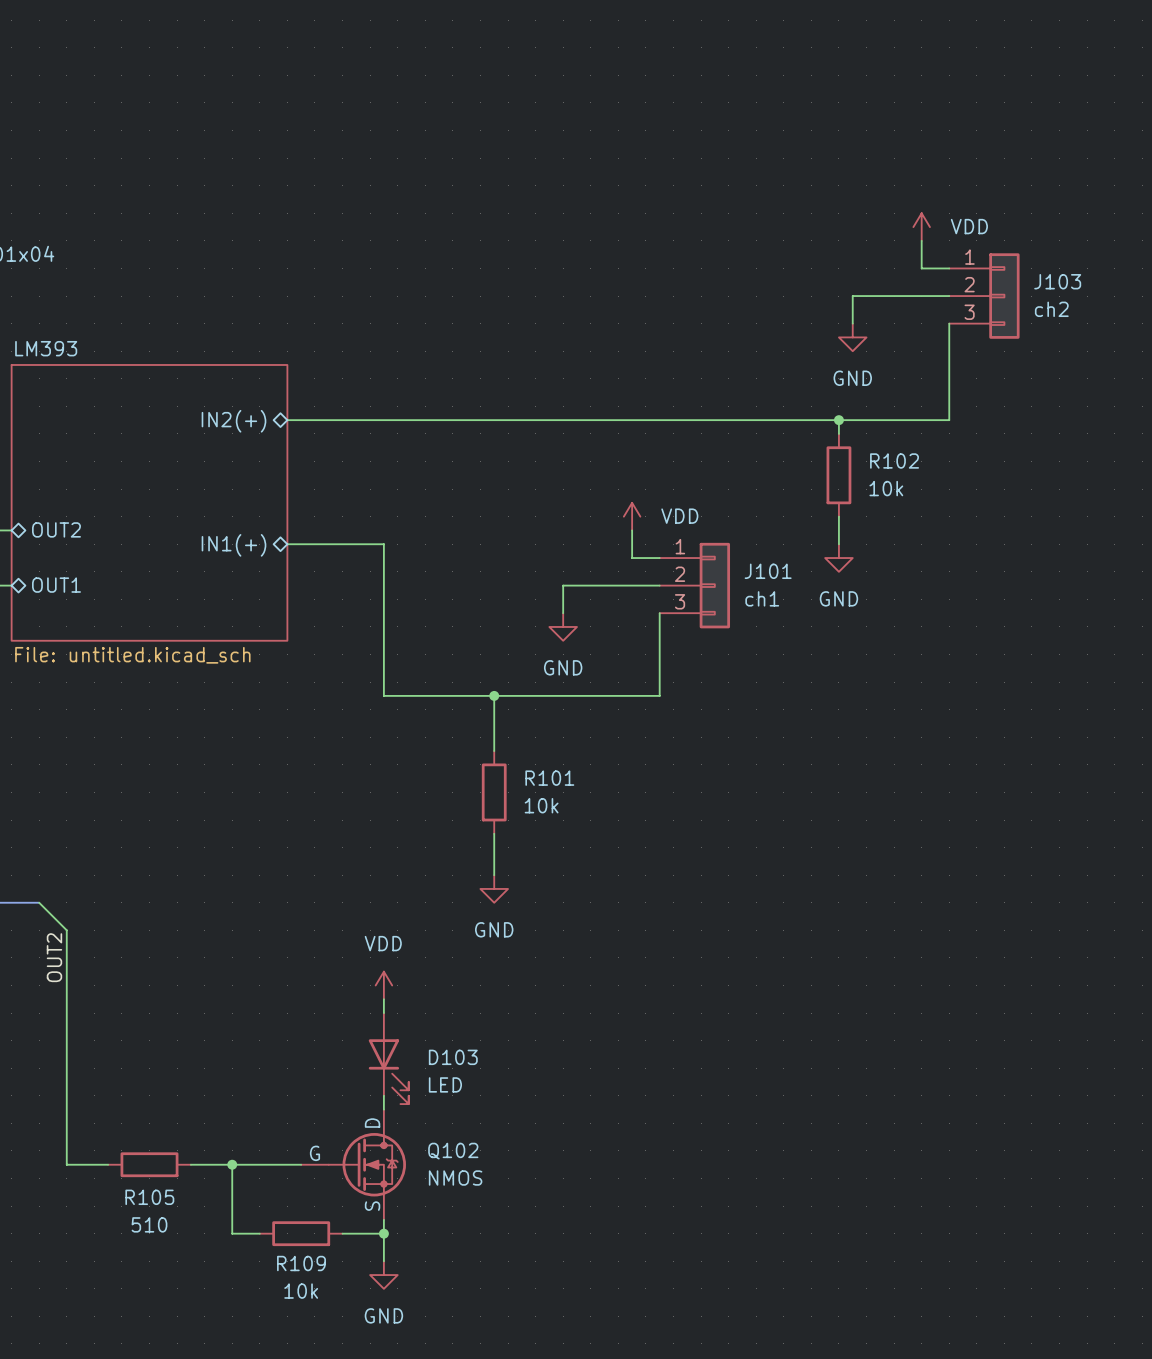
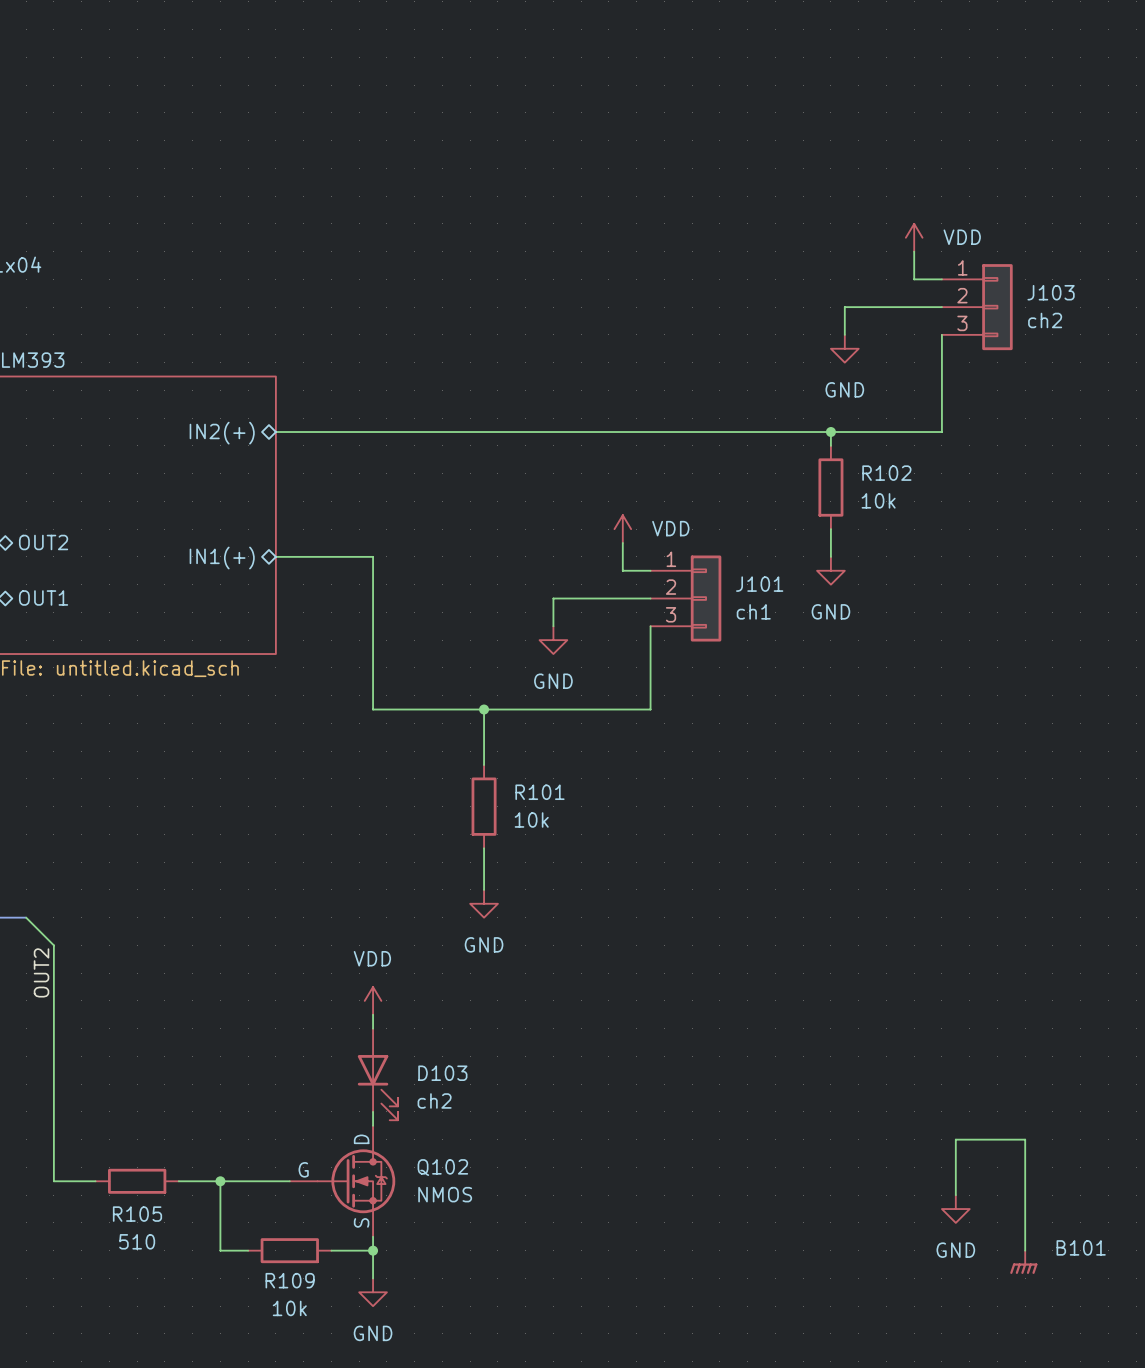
D103 value: LED (445, 1084) -> ch2 (434, 1100)
wire: none -> (955, 1195) (955, 1139) (1025, 1139) (1025, 1250)
power symbol: none -> GND (955, 1209)
B101: none -> (1023, 1262)

